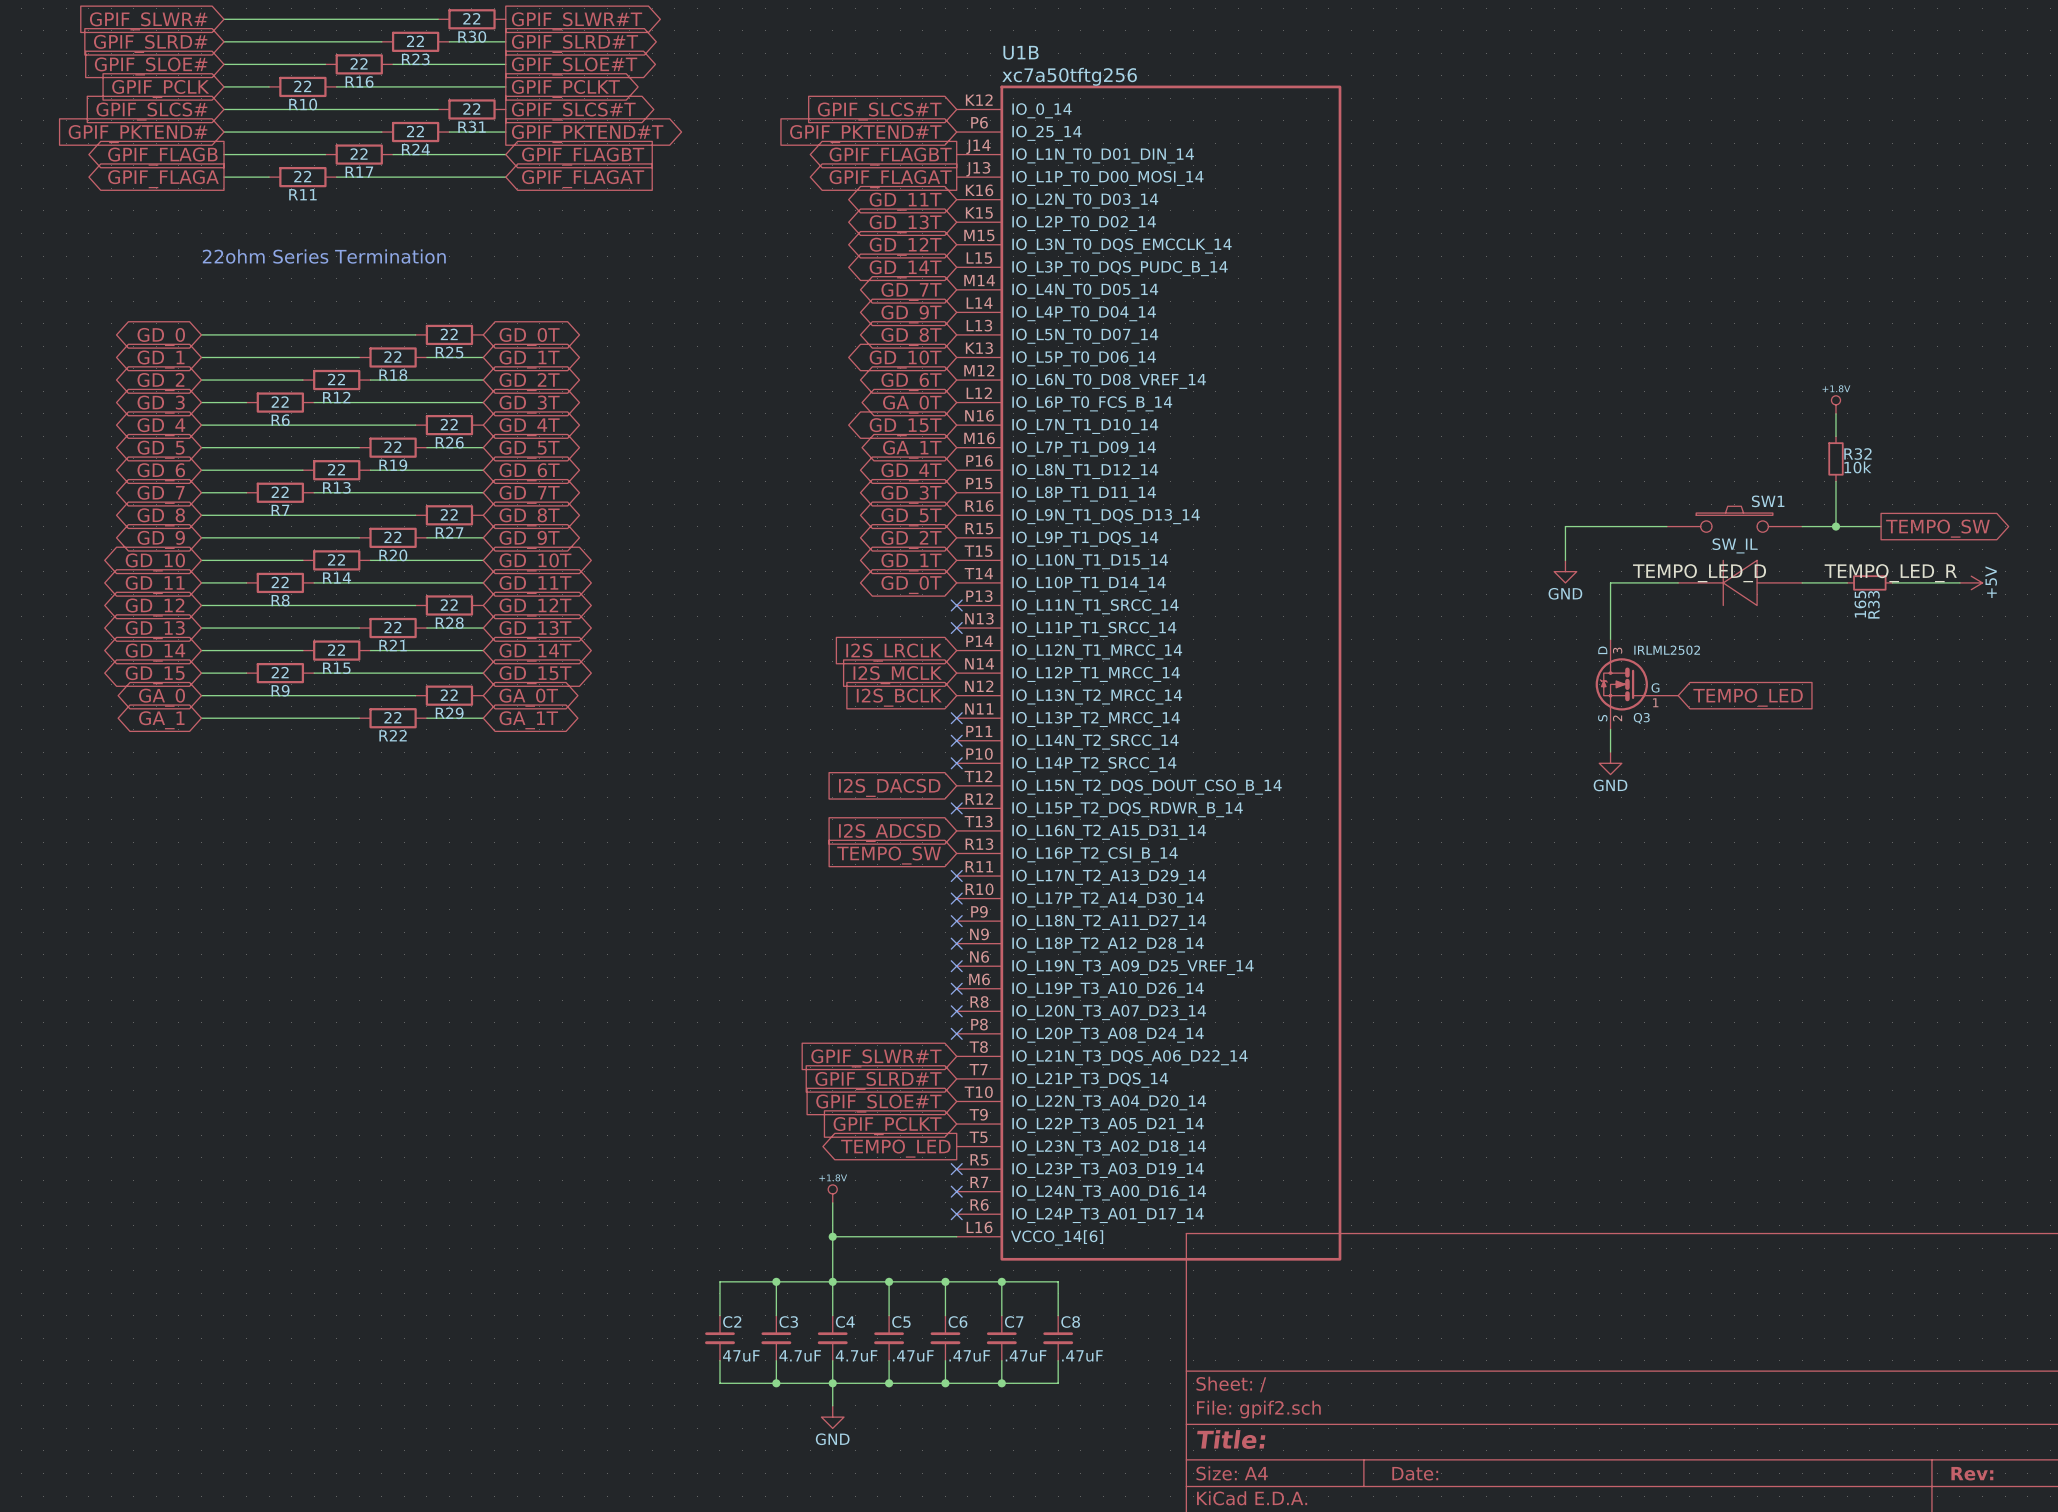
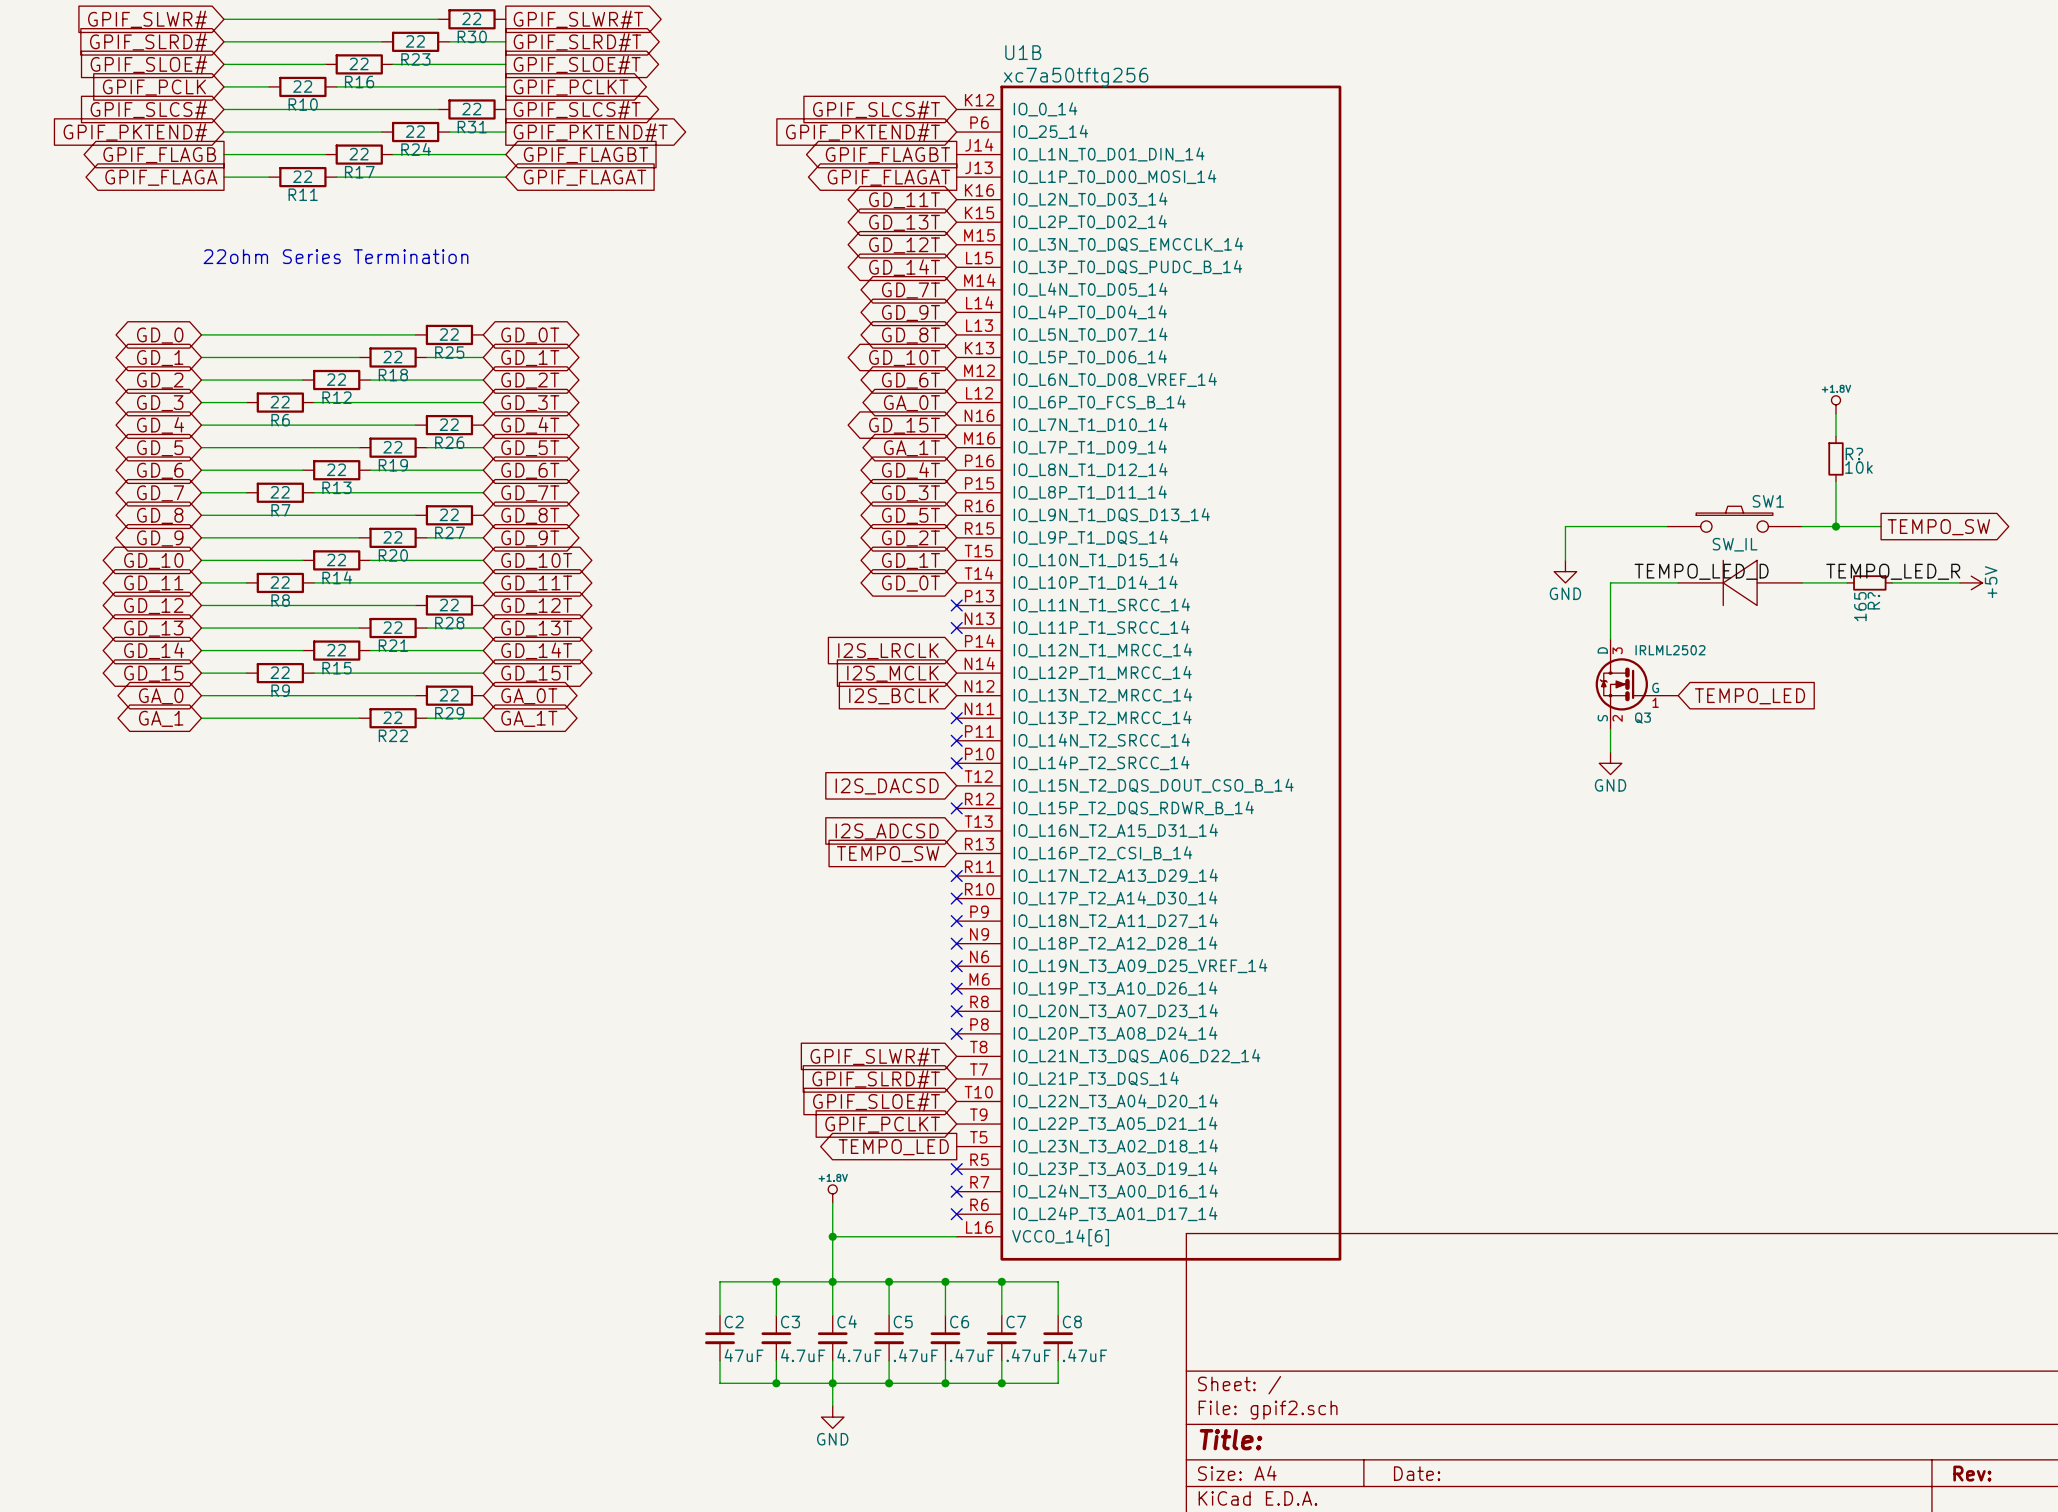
R32 name: R32 (1857, 454) -> R? (1854, 454)
R33 name: R33 (1873, 604) -> R? (1873, 600)

